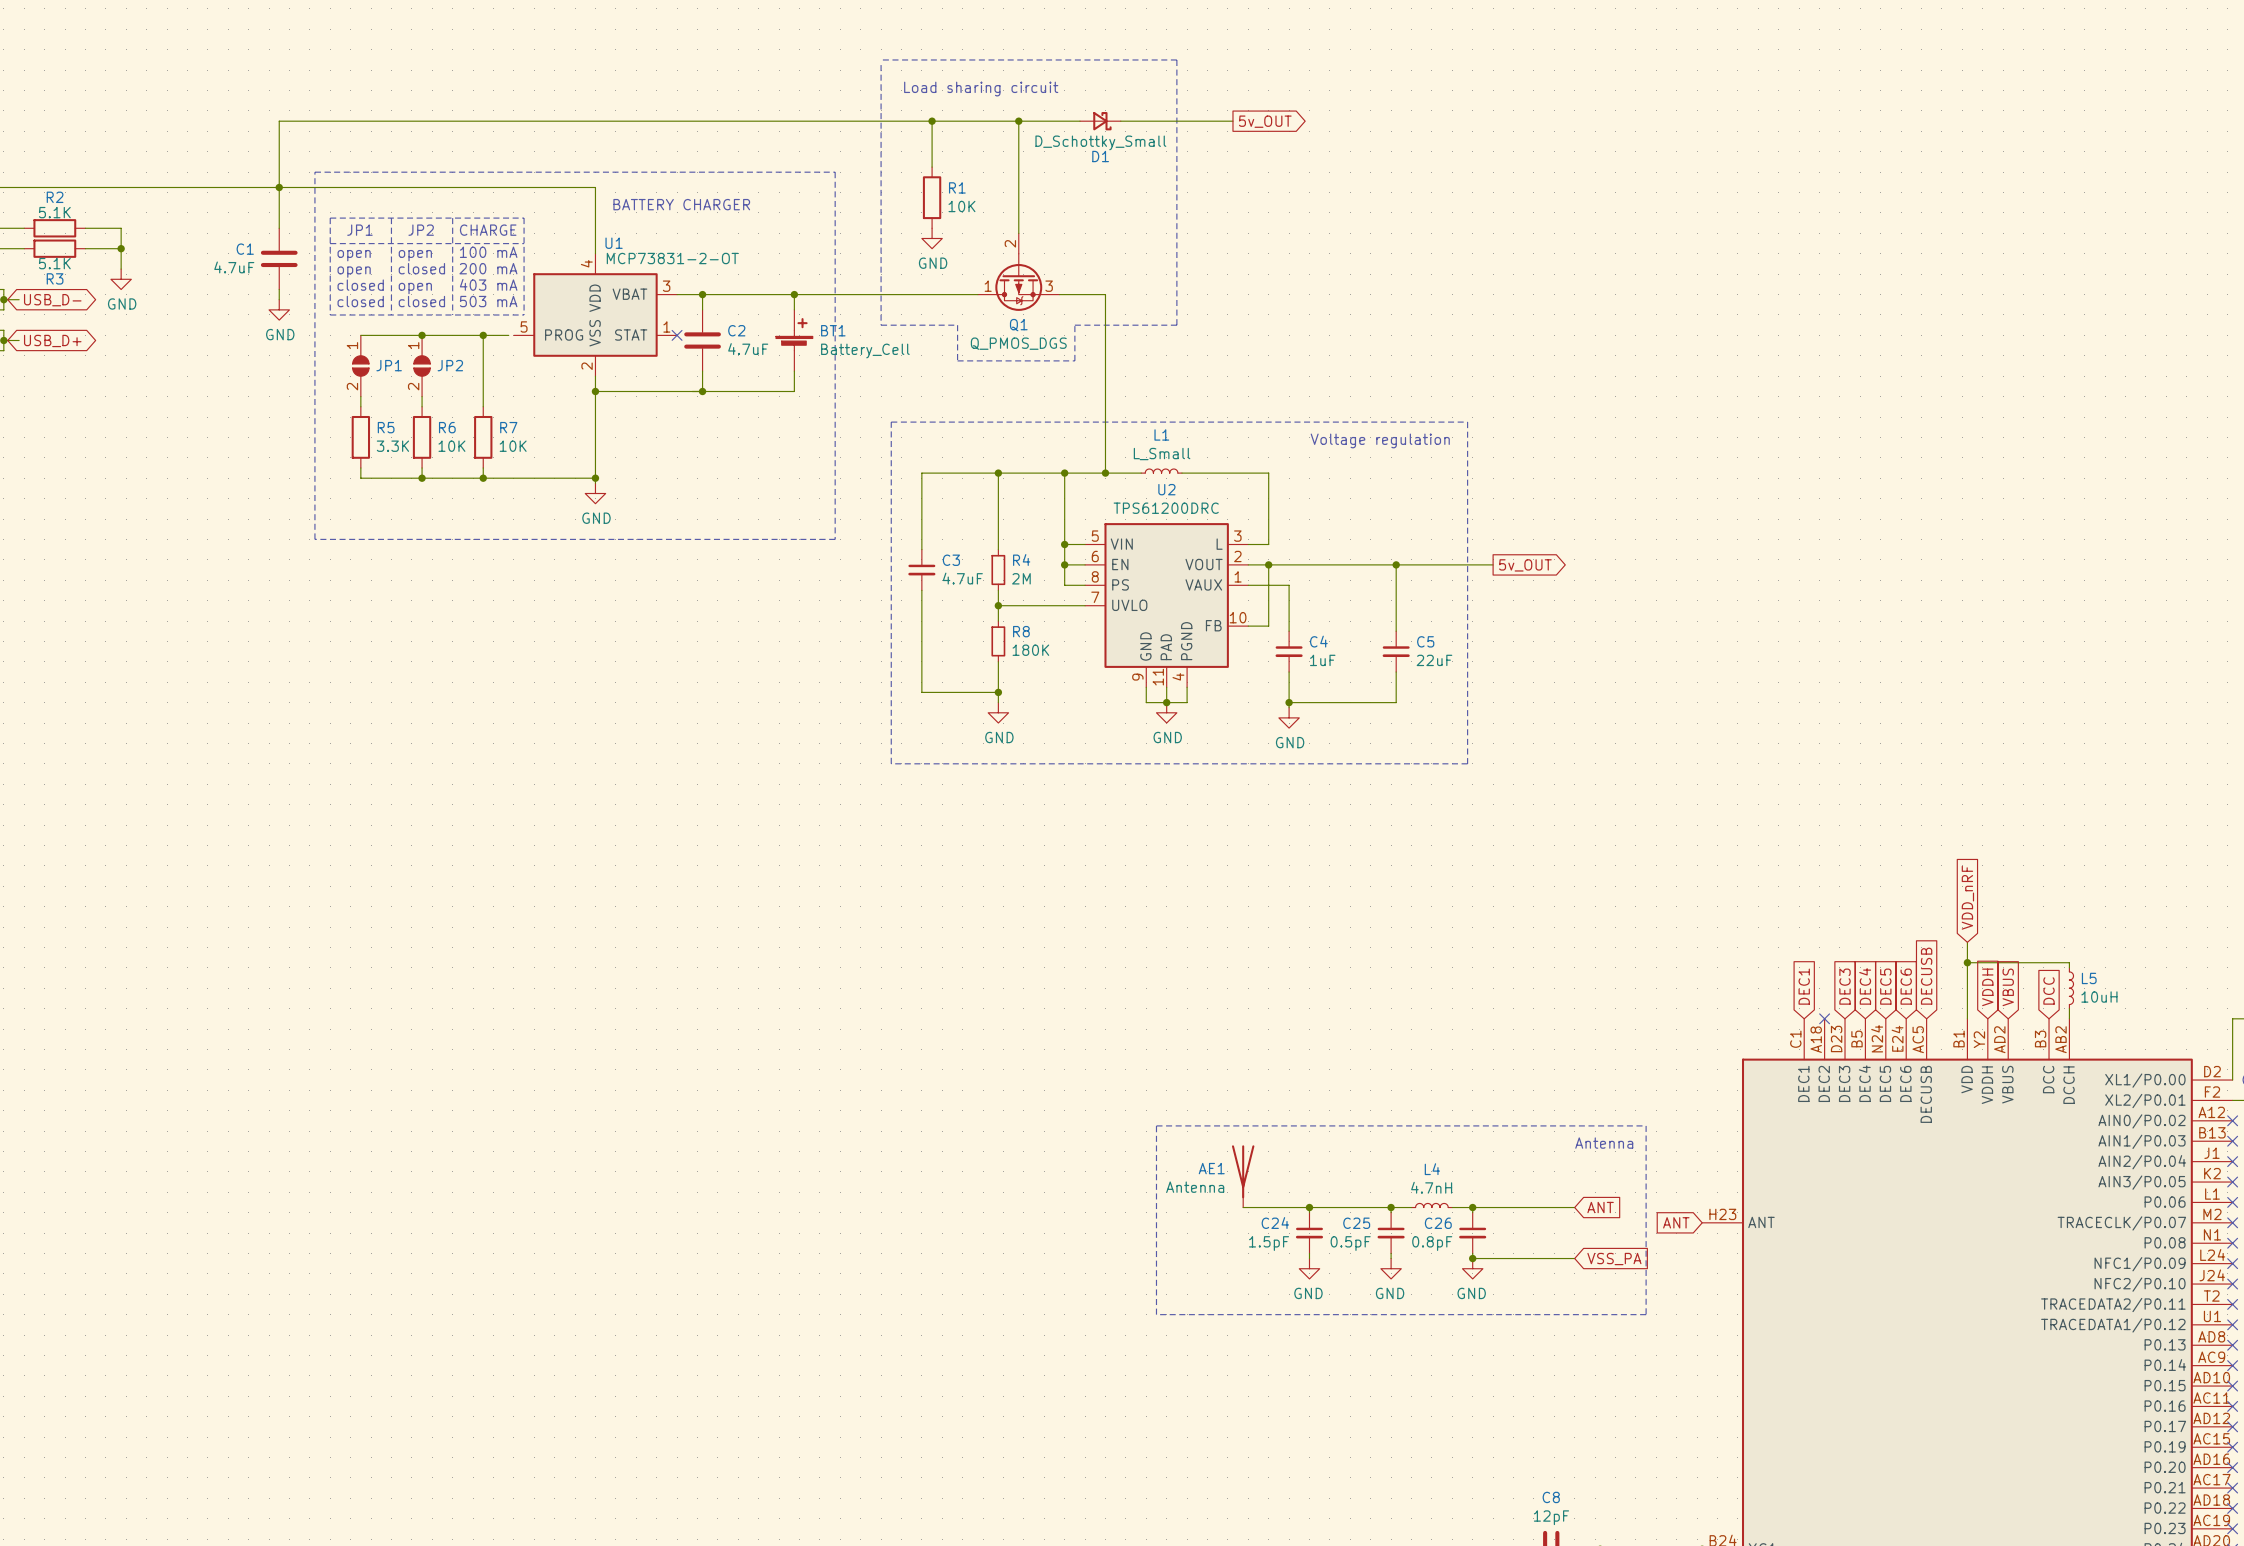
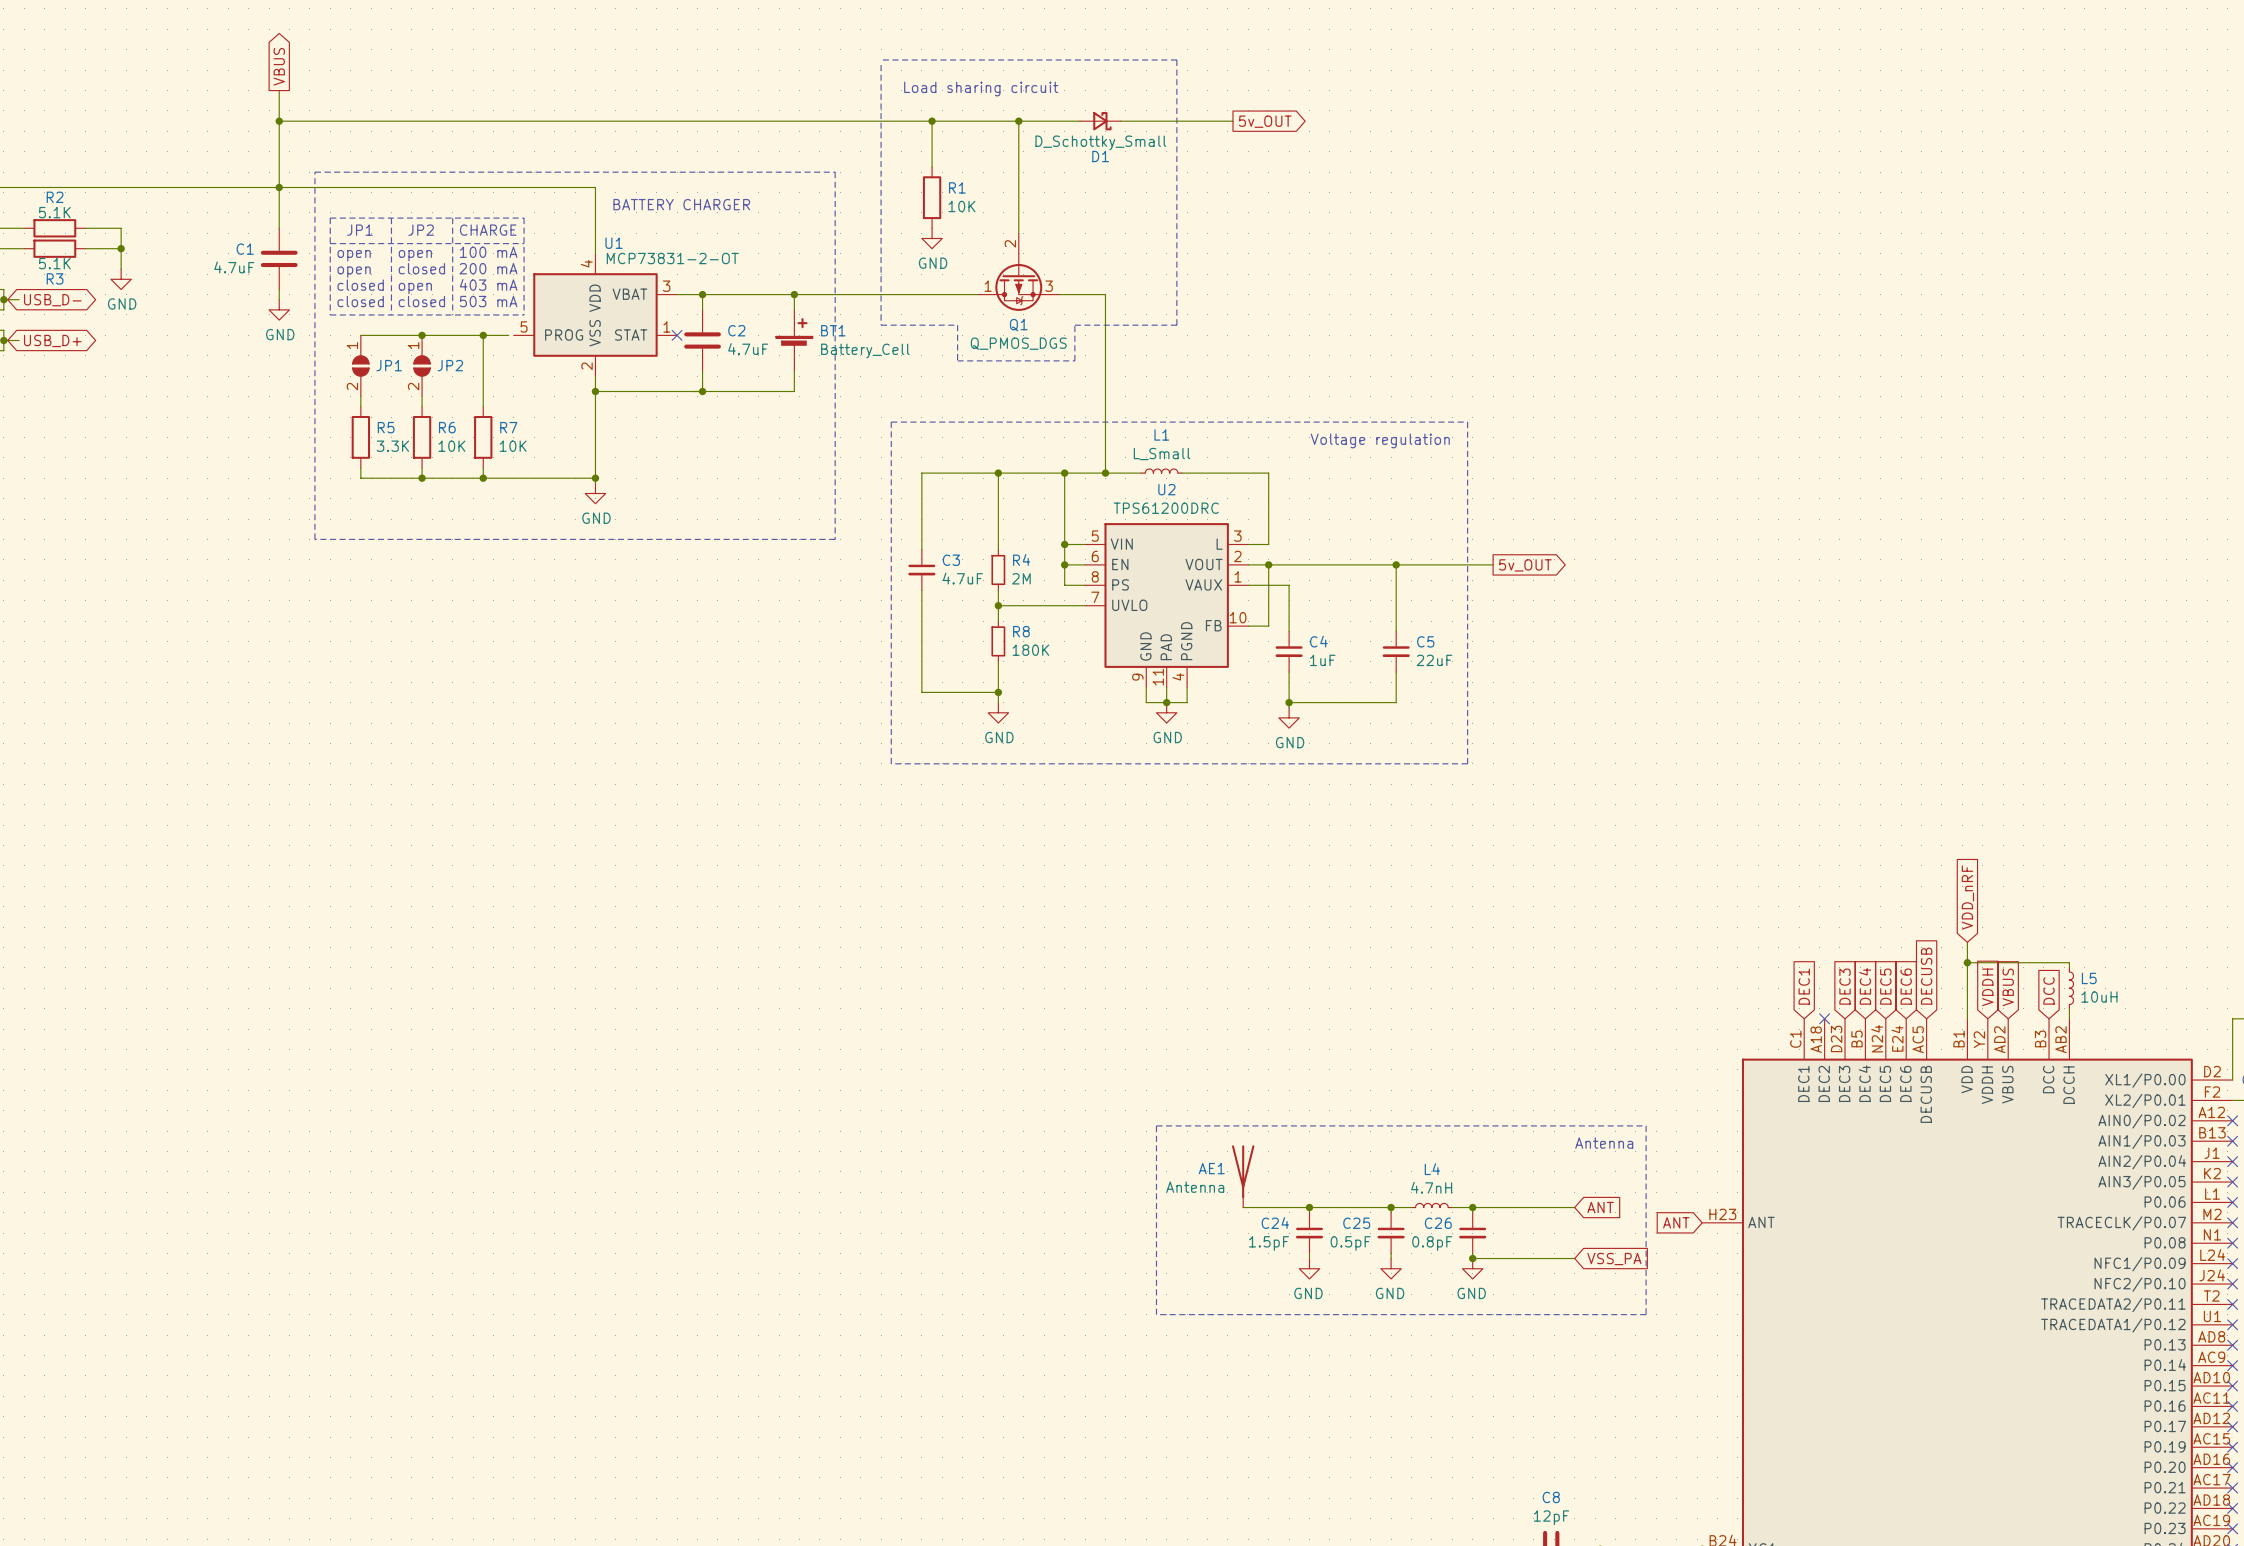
global label: none -> VBUS (279, 66)
wire: none -> (279, 90) (279, 121)
junction: none -> (279, 121)

